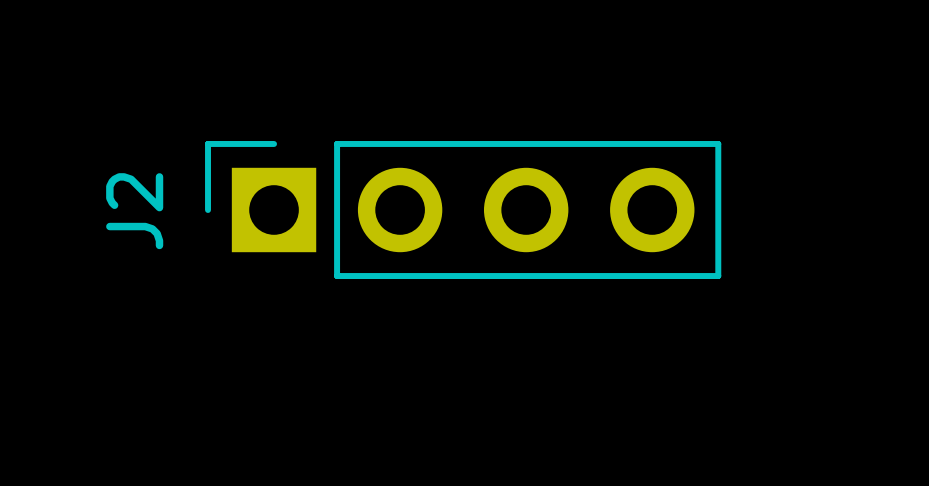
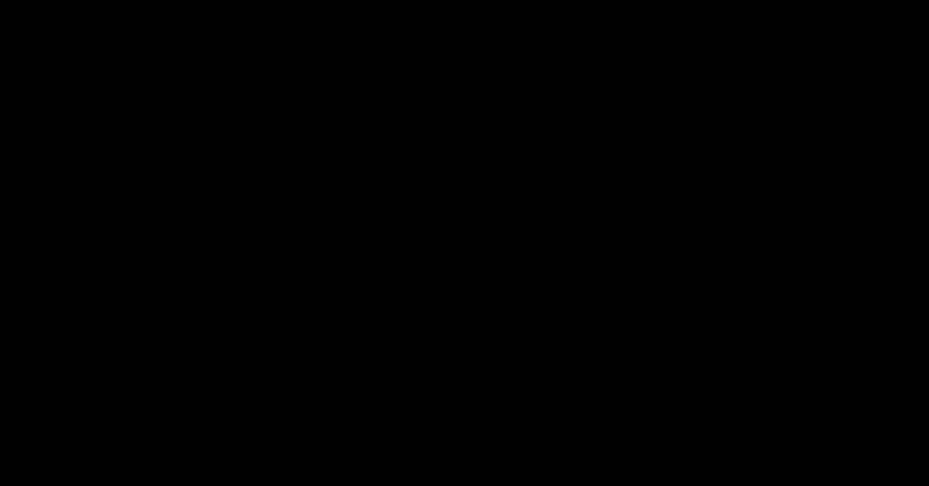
J2: (463, 209) -> none

